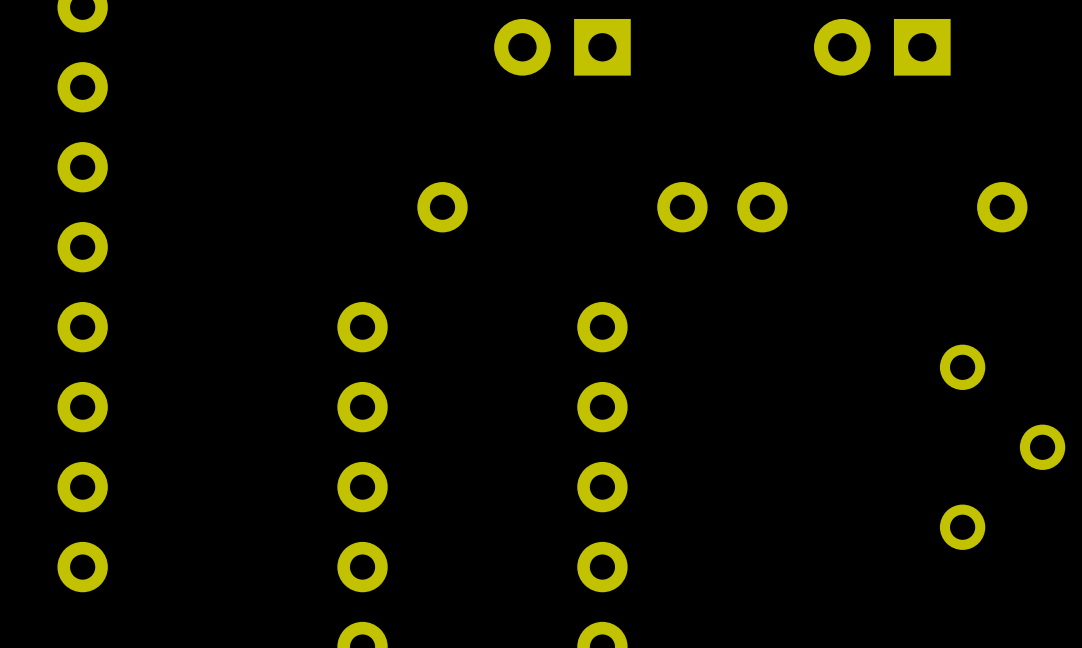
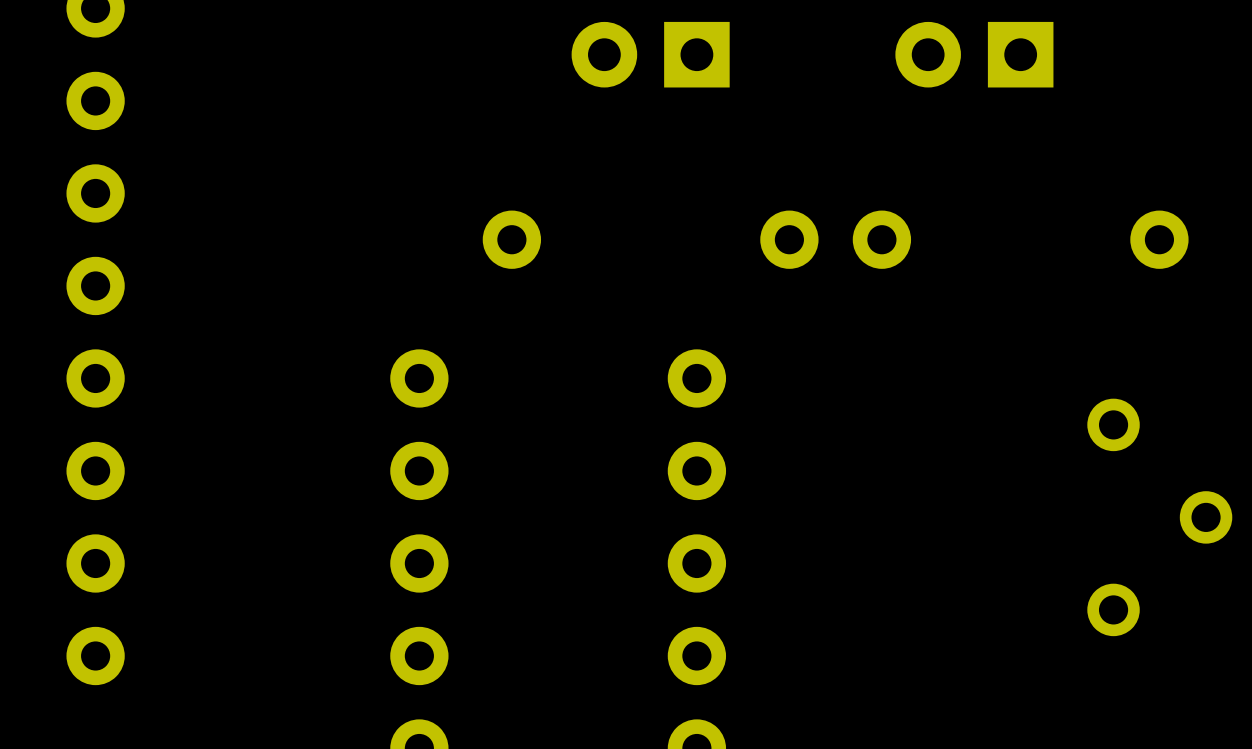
part position: (882, 47) -> (974, 54)

